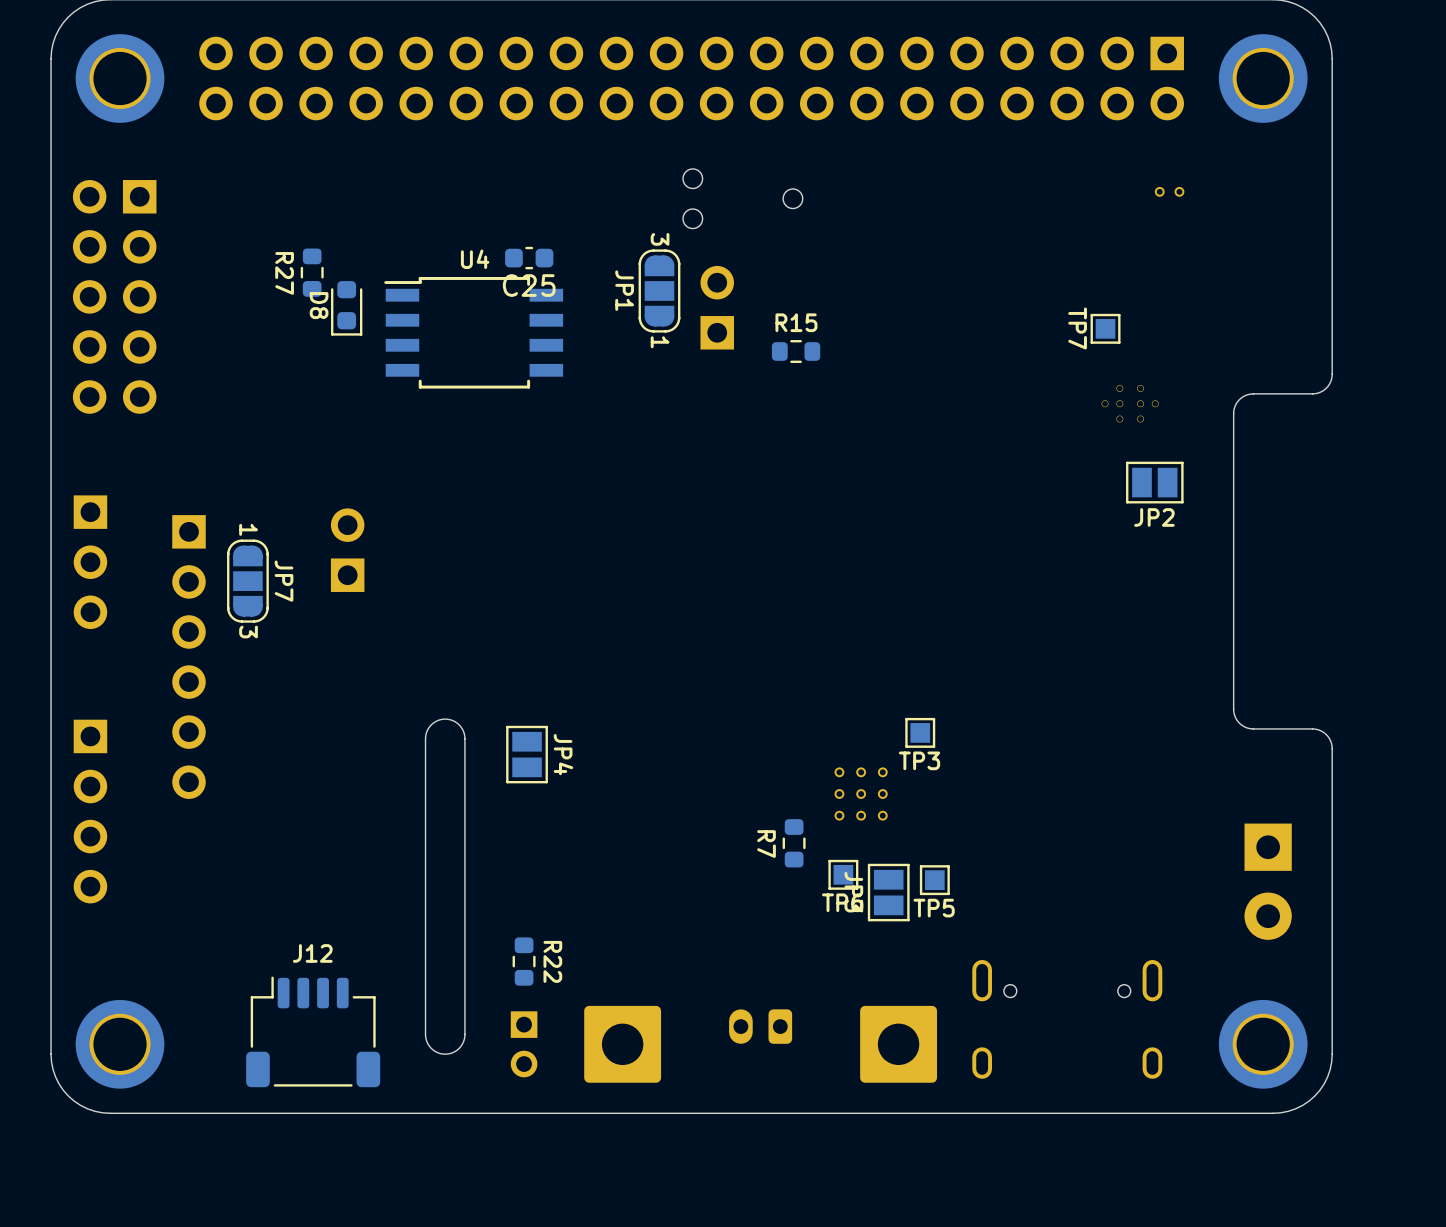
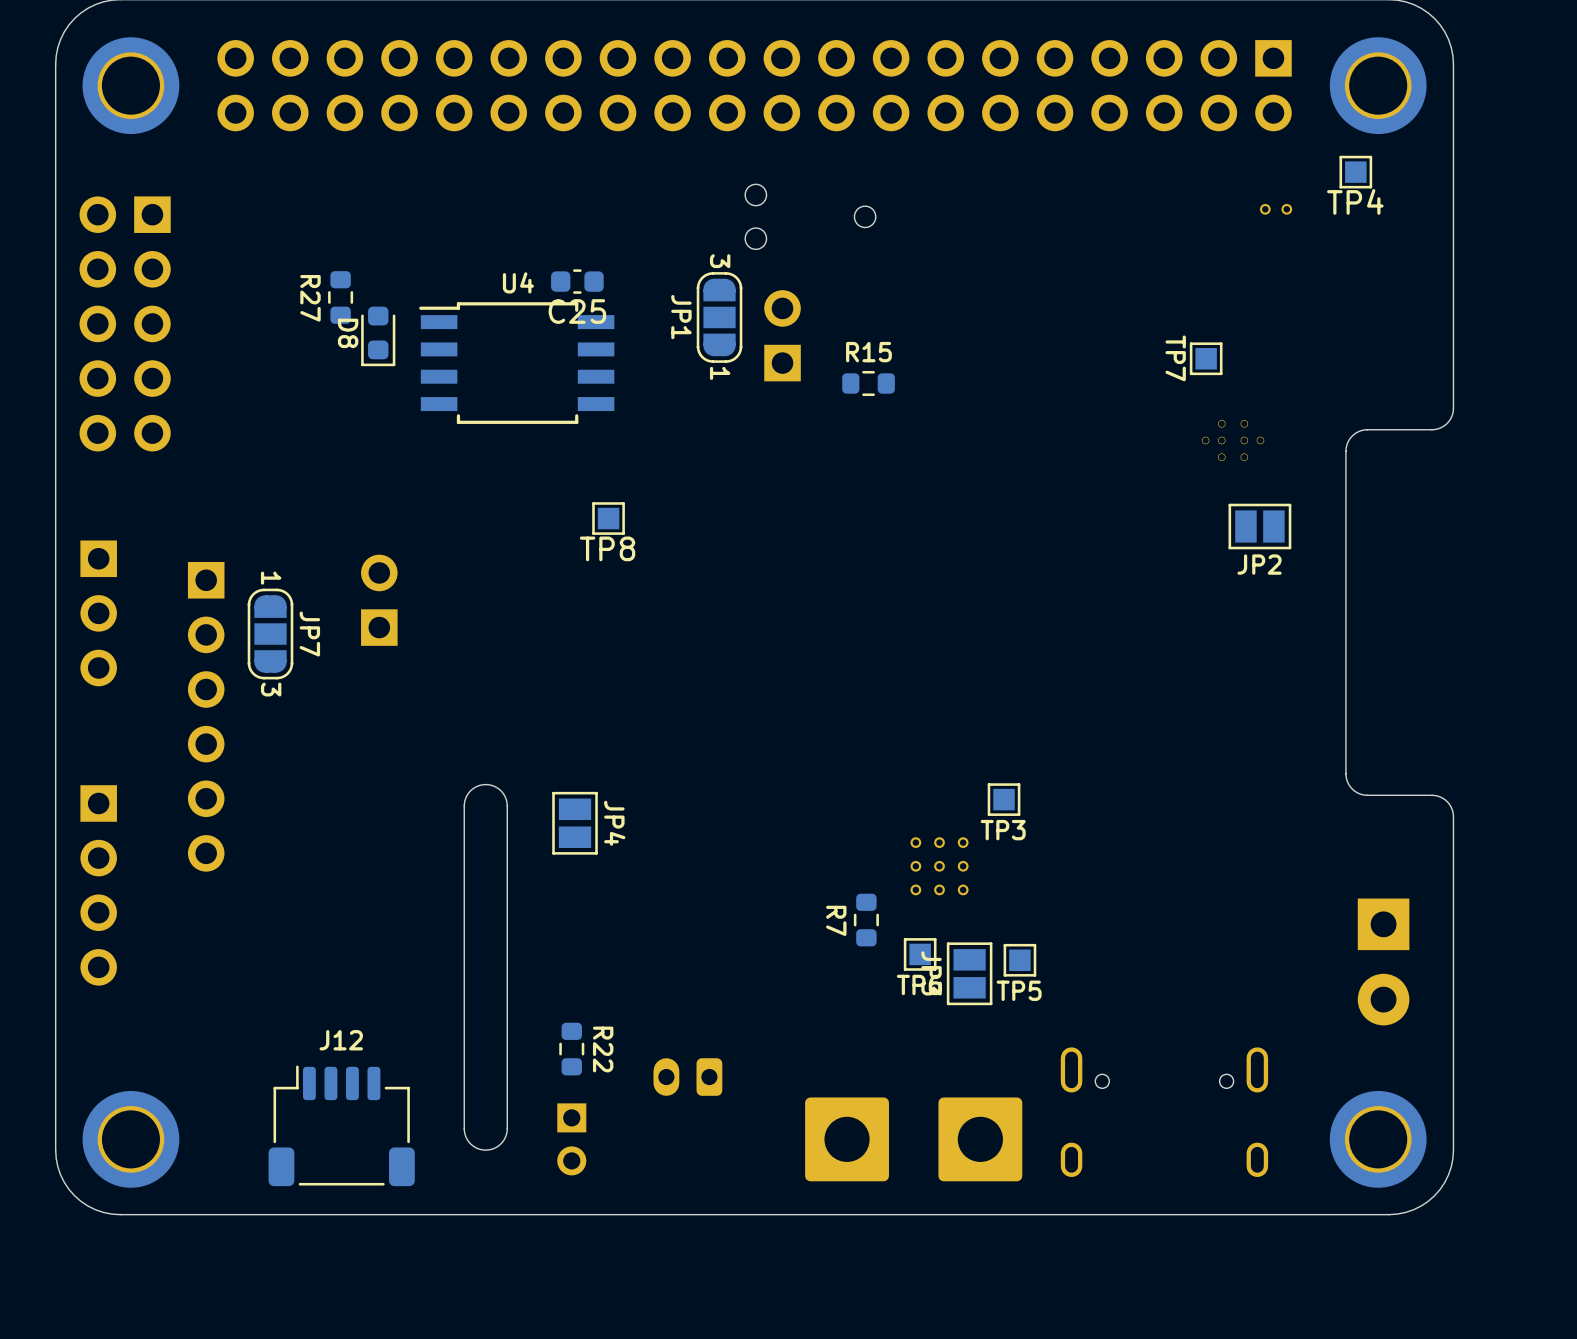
TP4: none -> (1355, 172)
TP8: none -> (608, 518)
part position: (760, 1026) -> (687, 1077)
part position: (622, 1044) -> (847, 1139)

